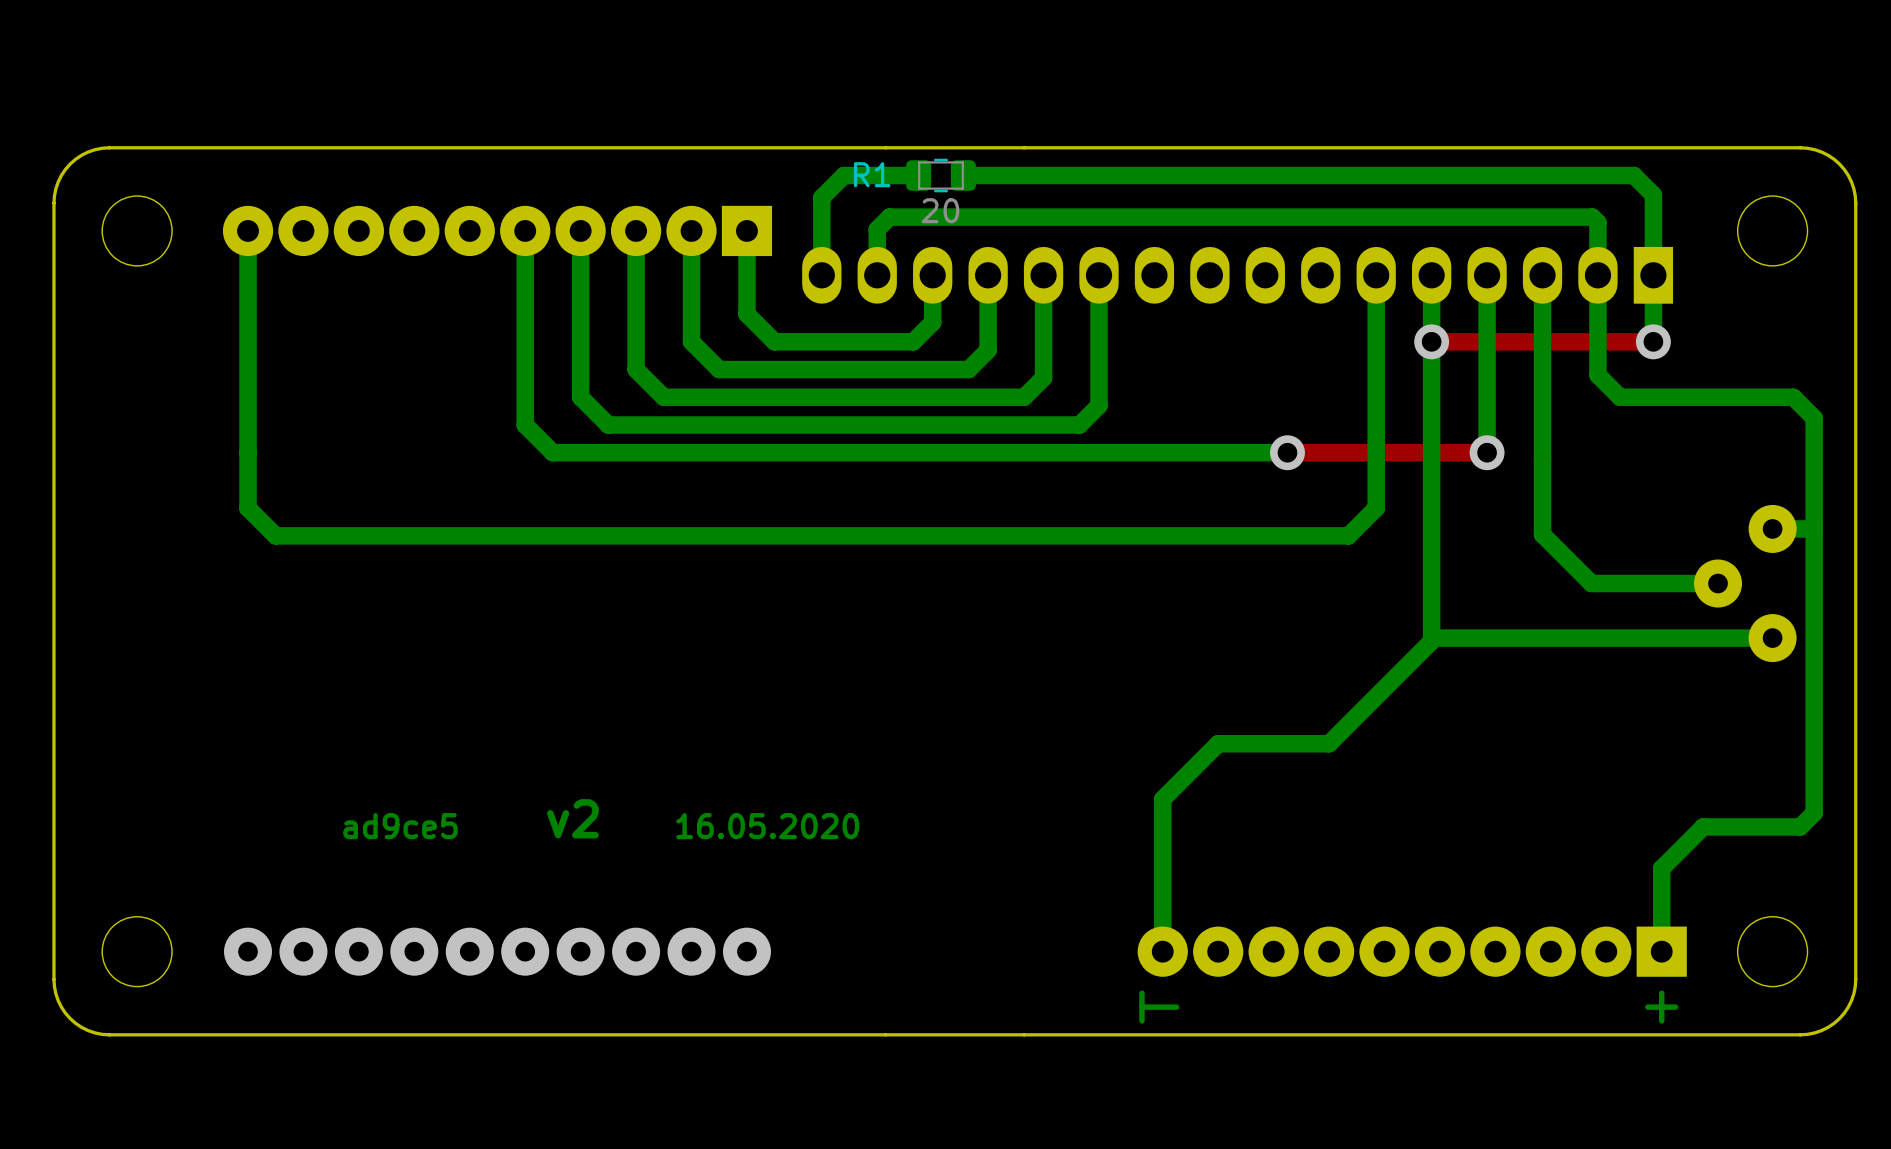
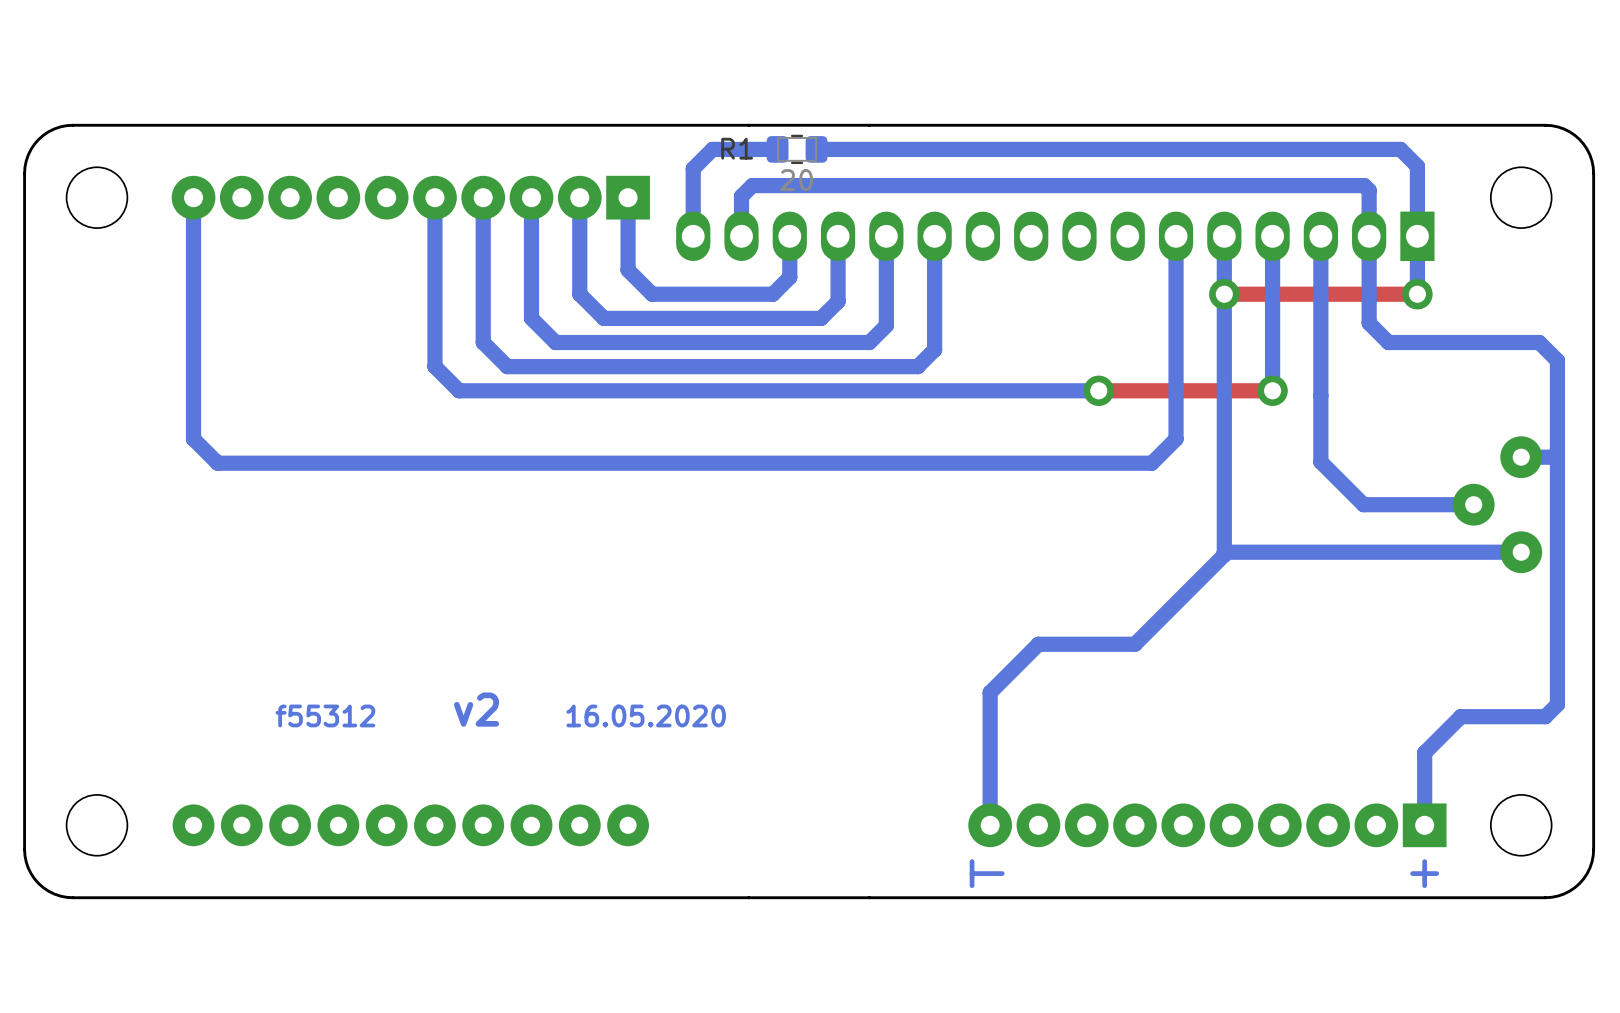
text: ad9ce5 (400, 826) -> f55312 (325, 715)

